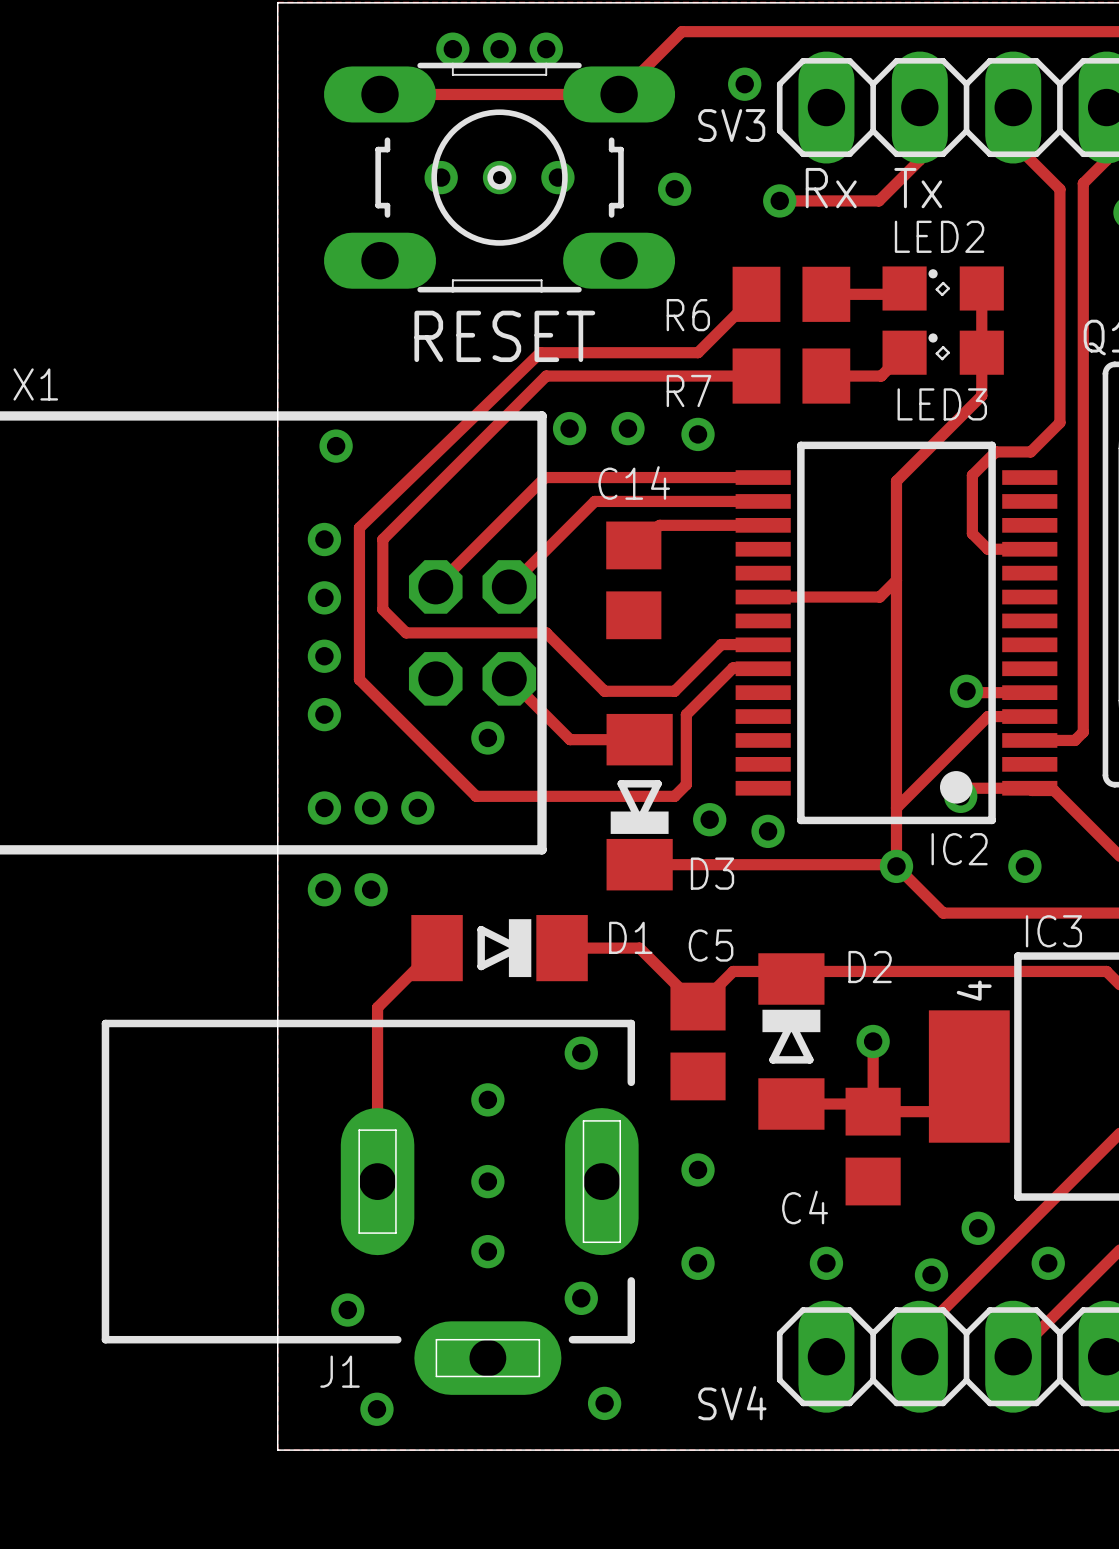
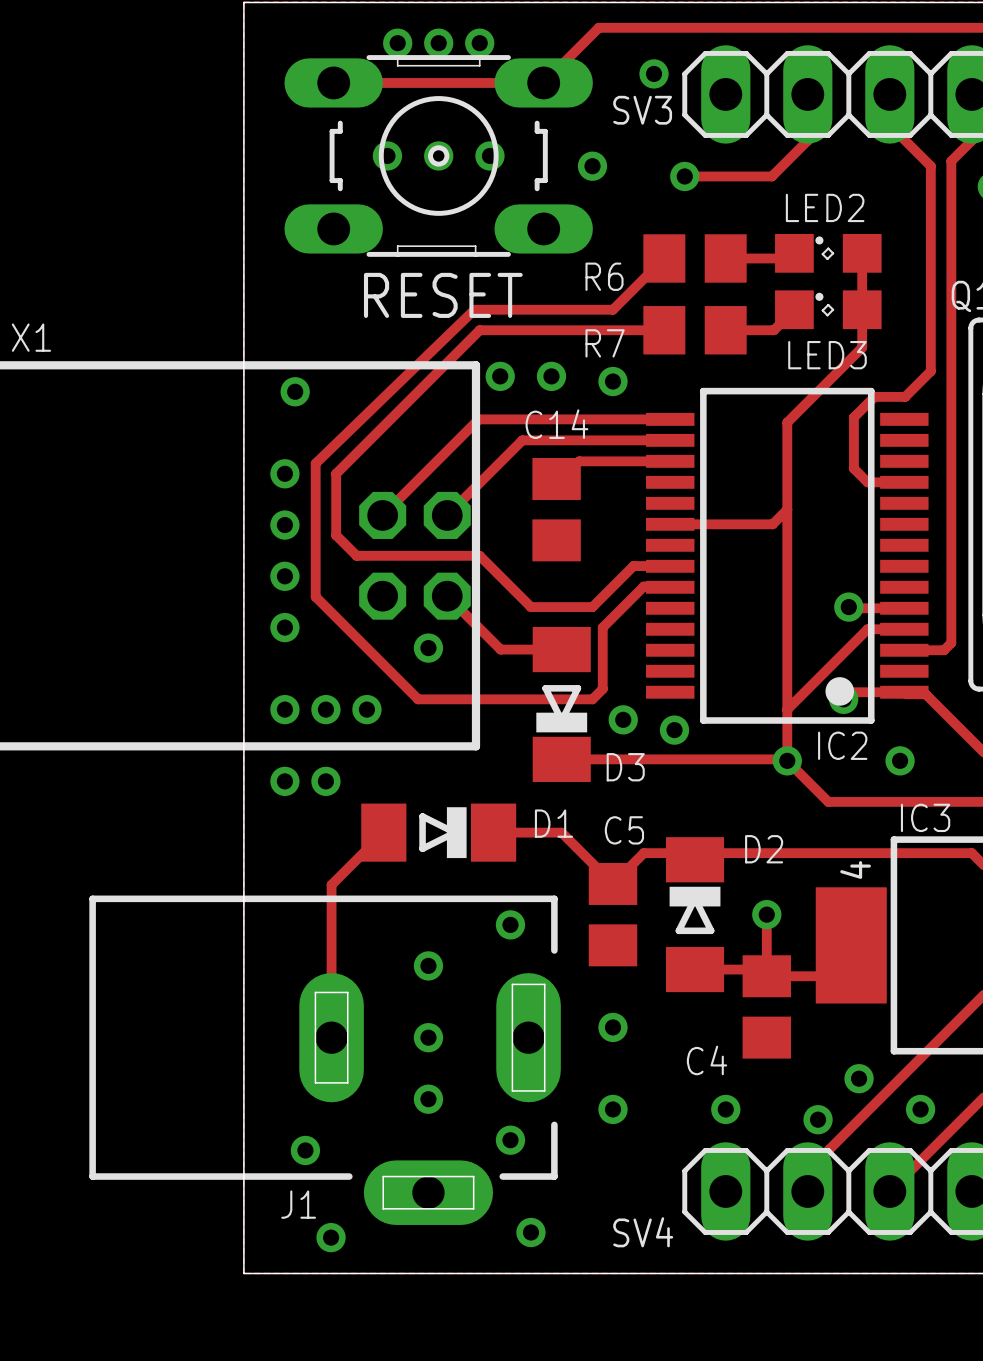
text: Rx (831, 188) -> none
text: Tx (918, 188) -> none

